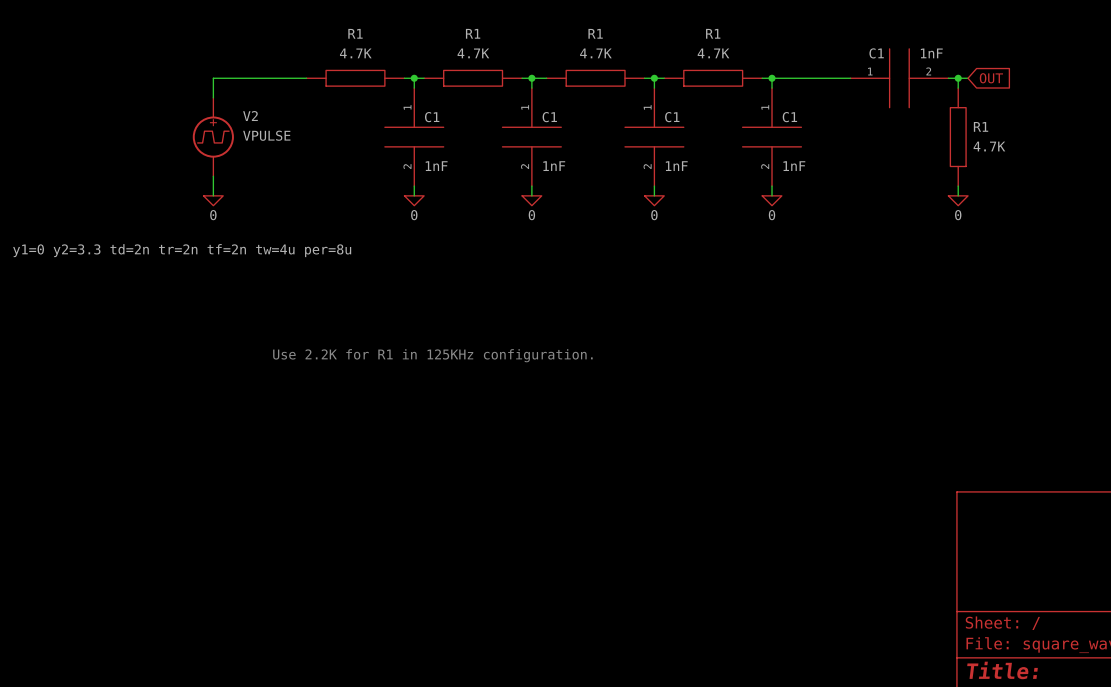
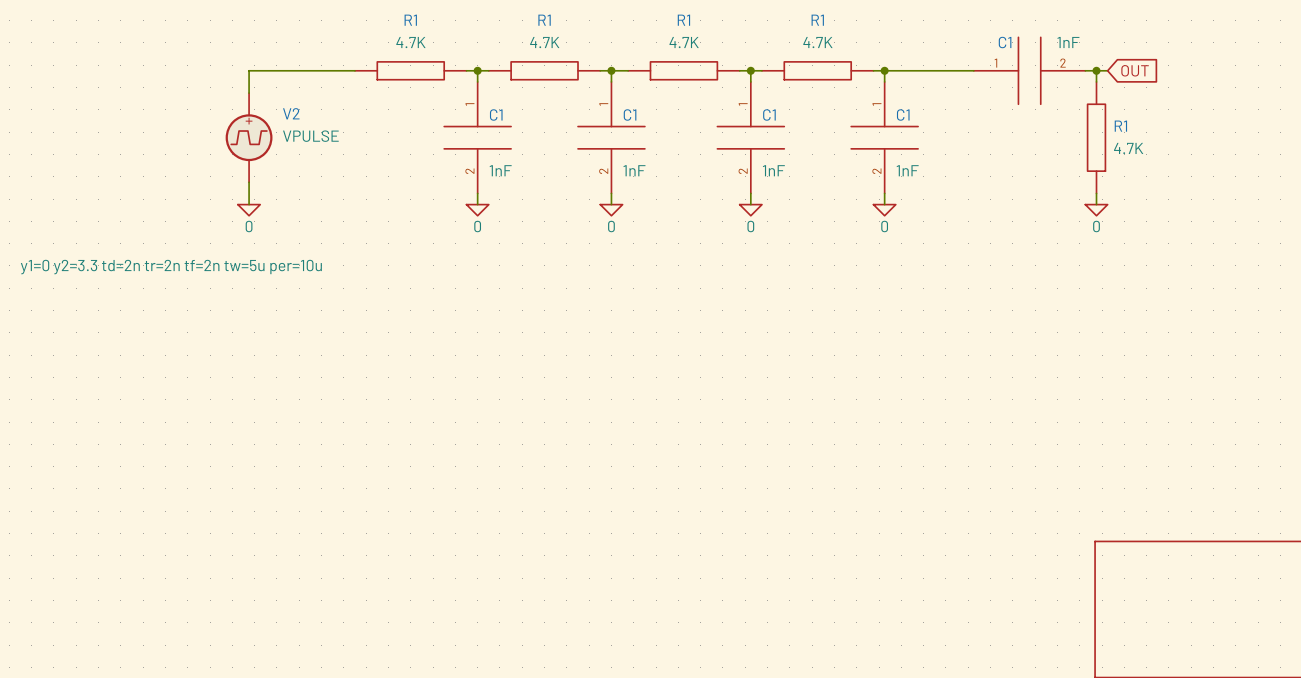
V2 text: y1=0 y2=3.3 td=2n tr=2n tf=2n tw=4u per=8u (182, 250) -> y1=0 y2=3.3 td=2n tr=2n tf=2n tw=5u per=10u (171, 267)
text: Use 2.2K for R1 in 125KHz configuration. (432, 355) -> none

